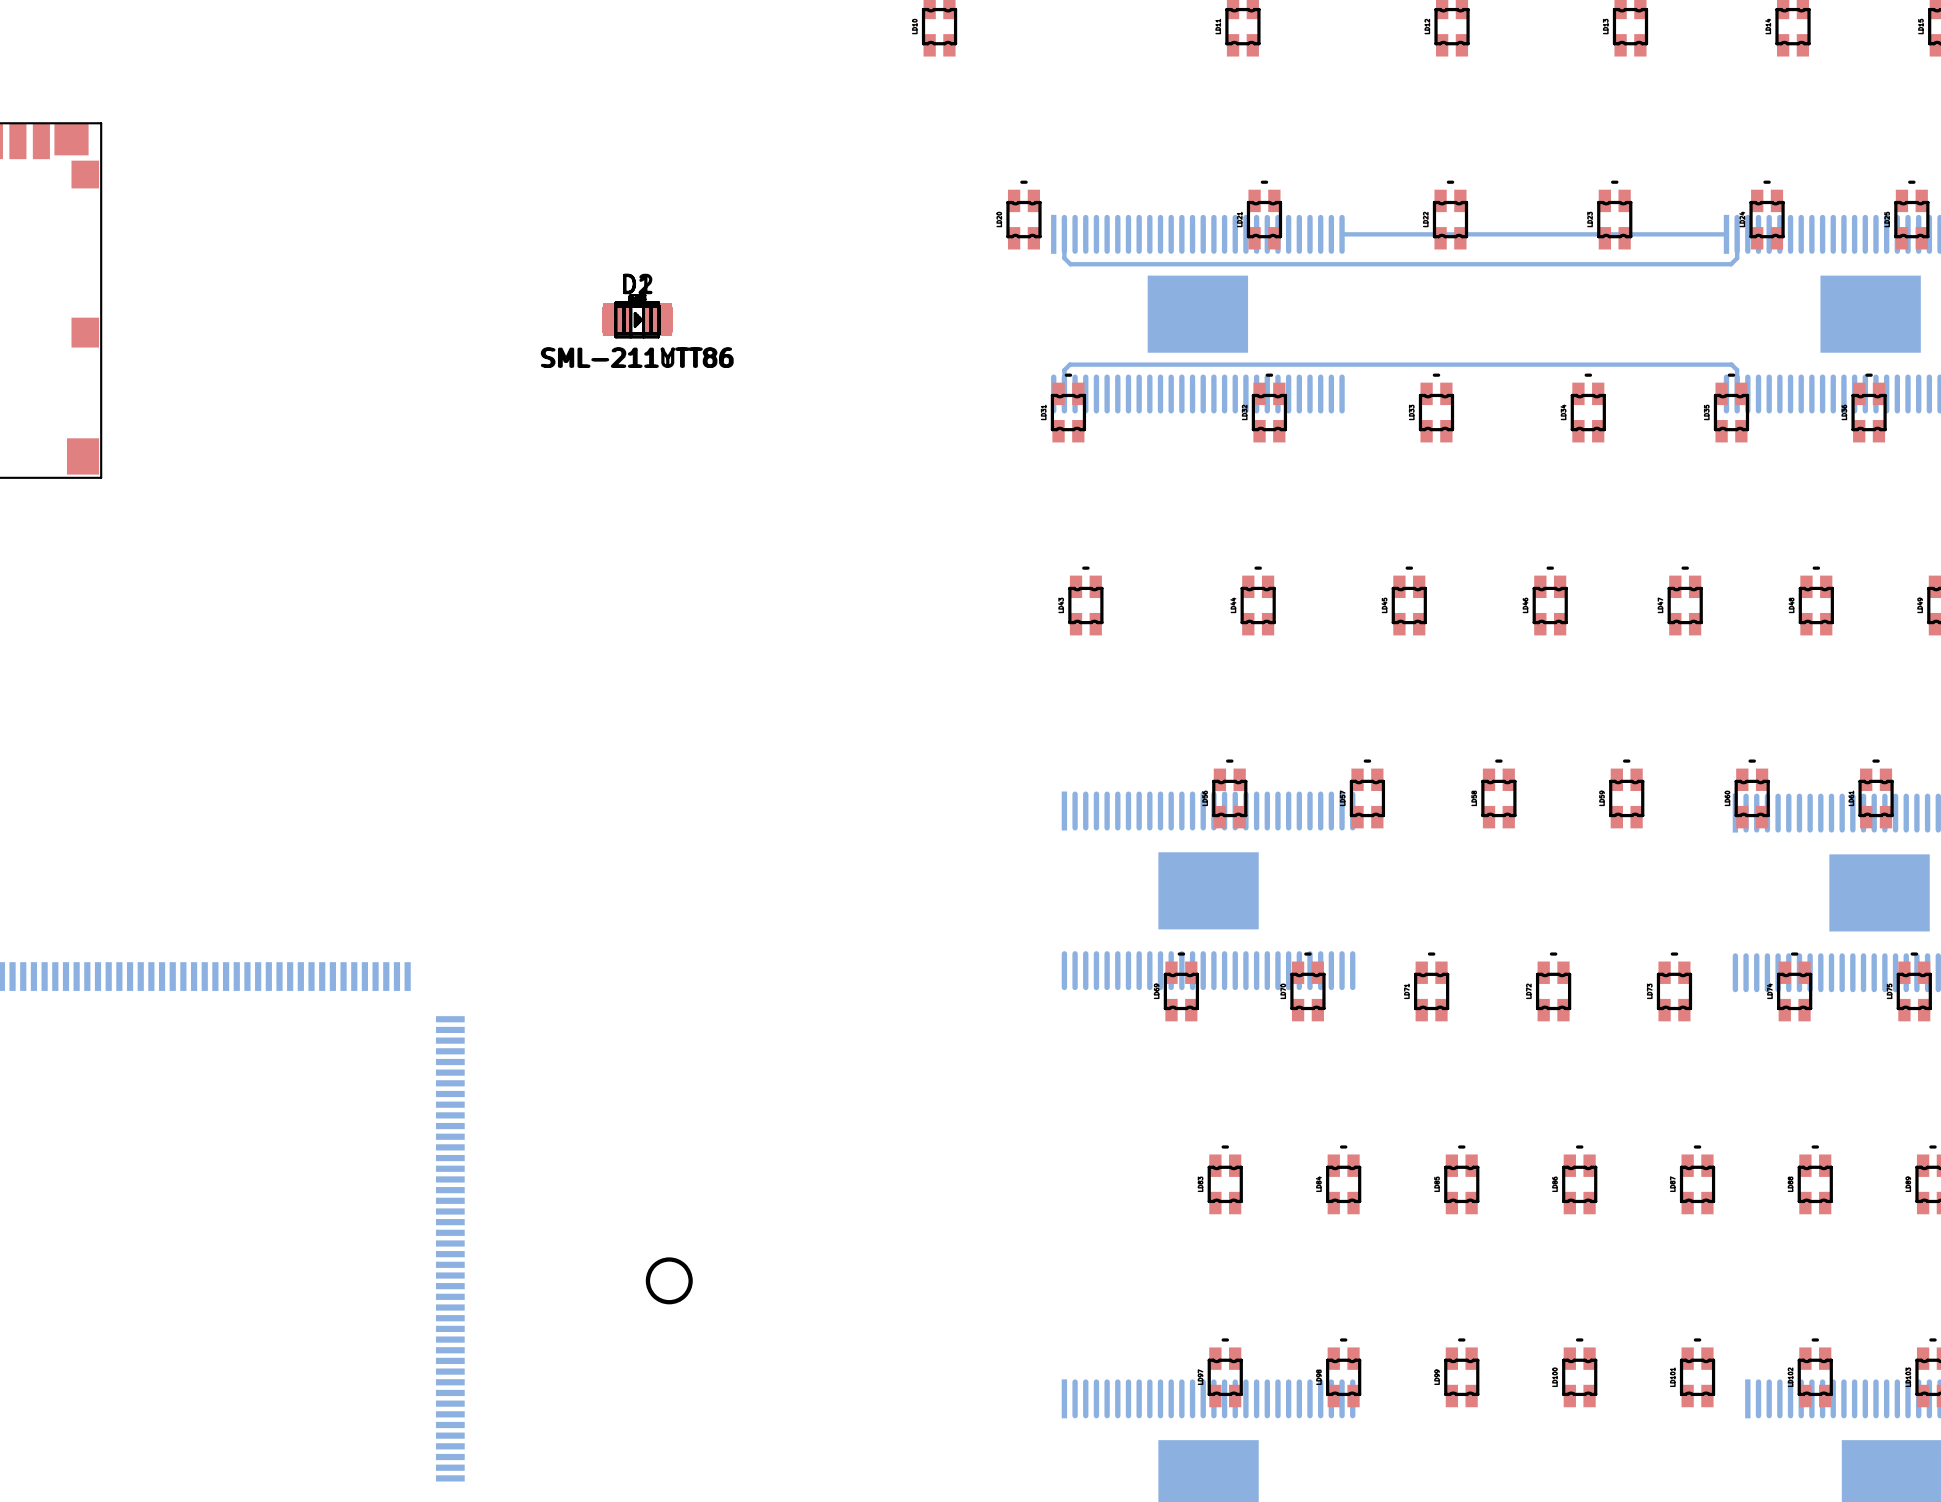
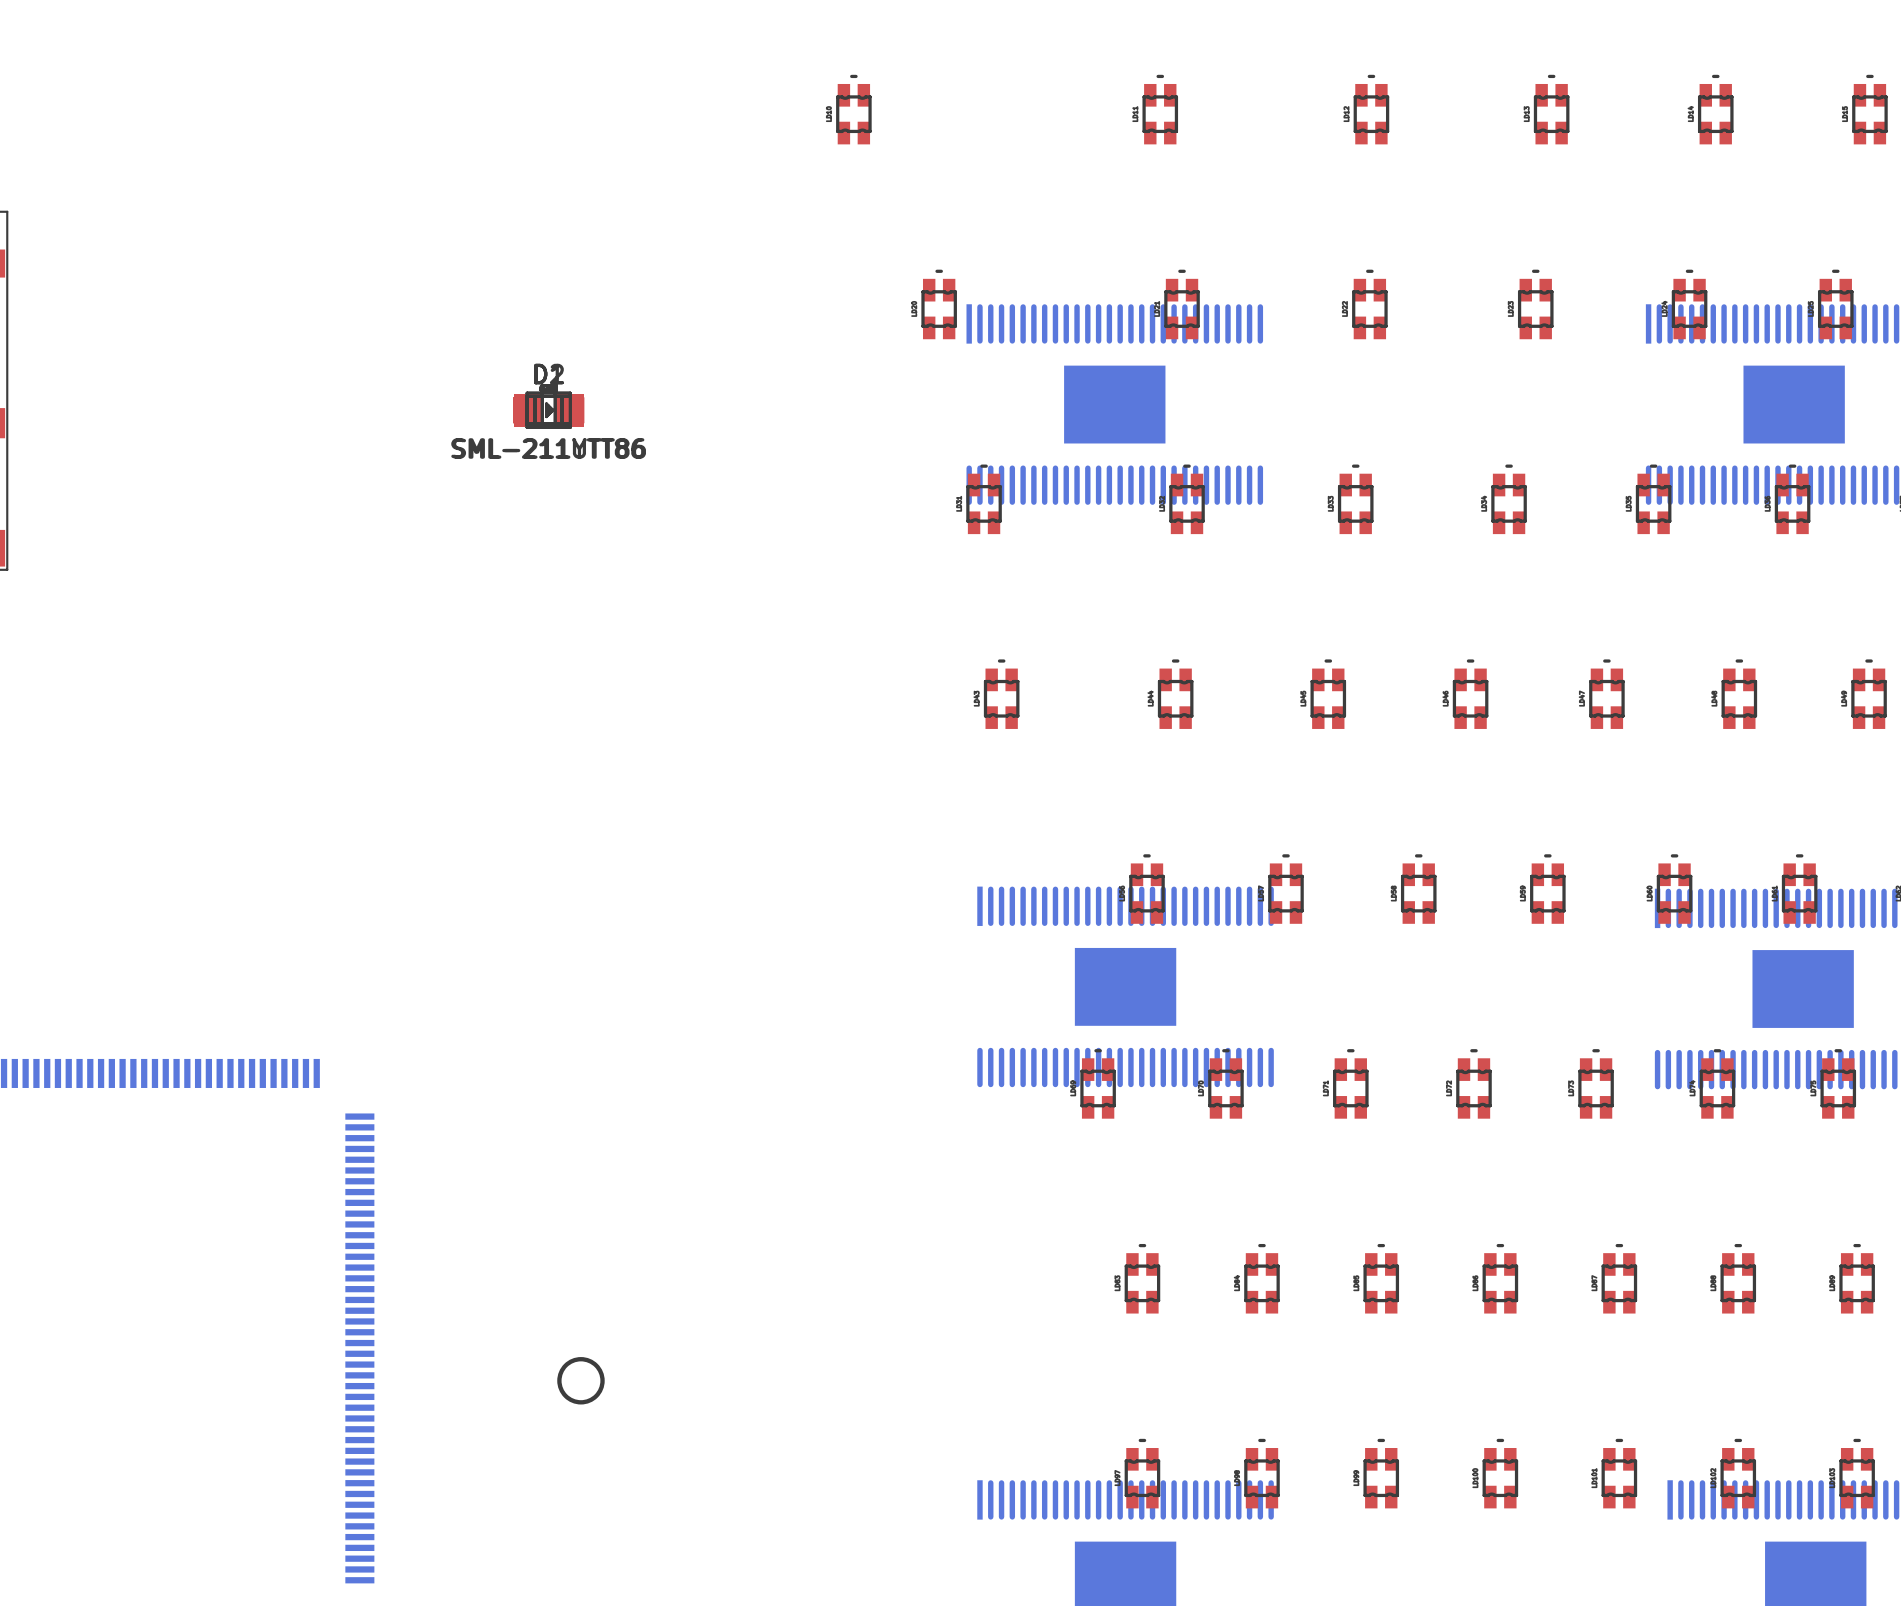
bottom track: (1064, 234) (1064, 258) (1070, 264) (1731, 264) (1737, 258) (1737, 234) -> none
bottom track: (1342, 234) (1726, 234) -> none
bottom track: (1064, 393) (1064, 370) (1069, 364) (1731, 364) (1737, 370) (1737, 393) -> none

